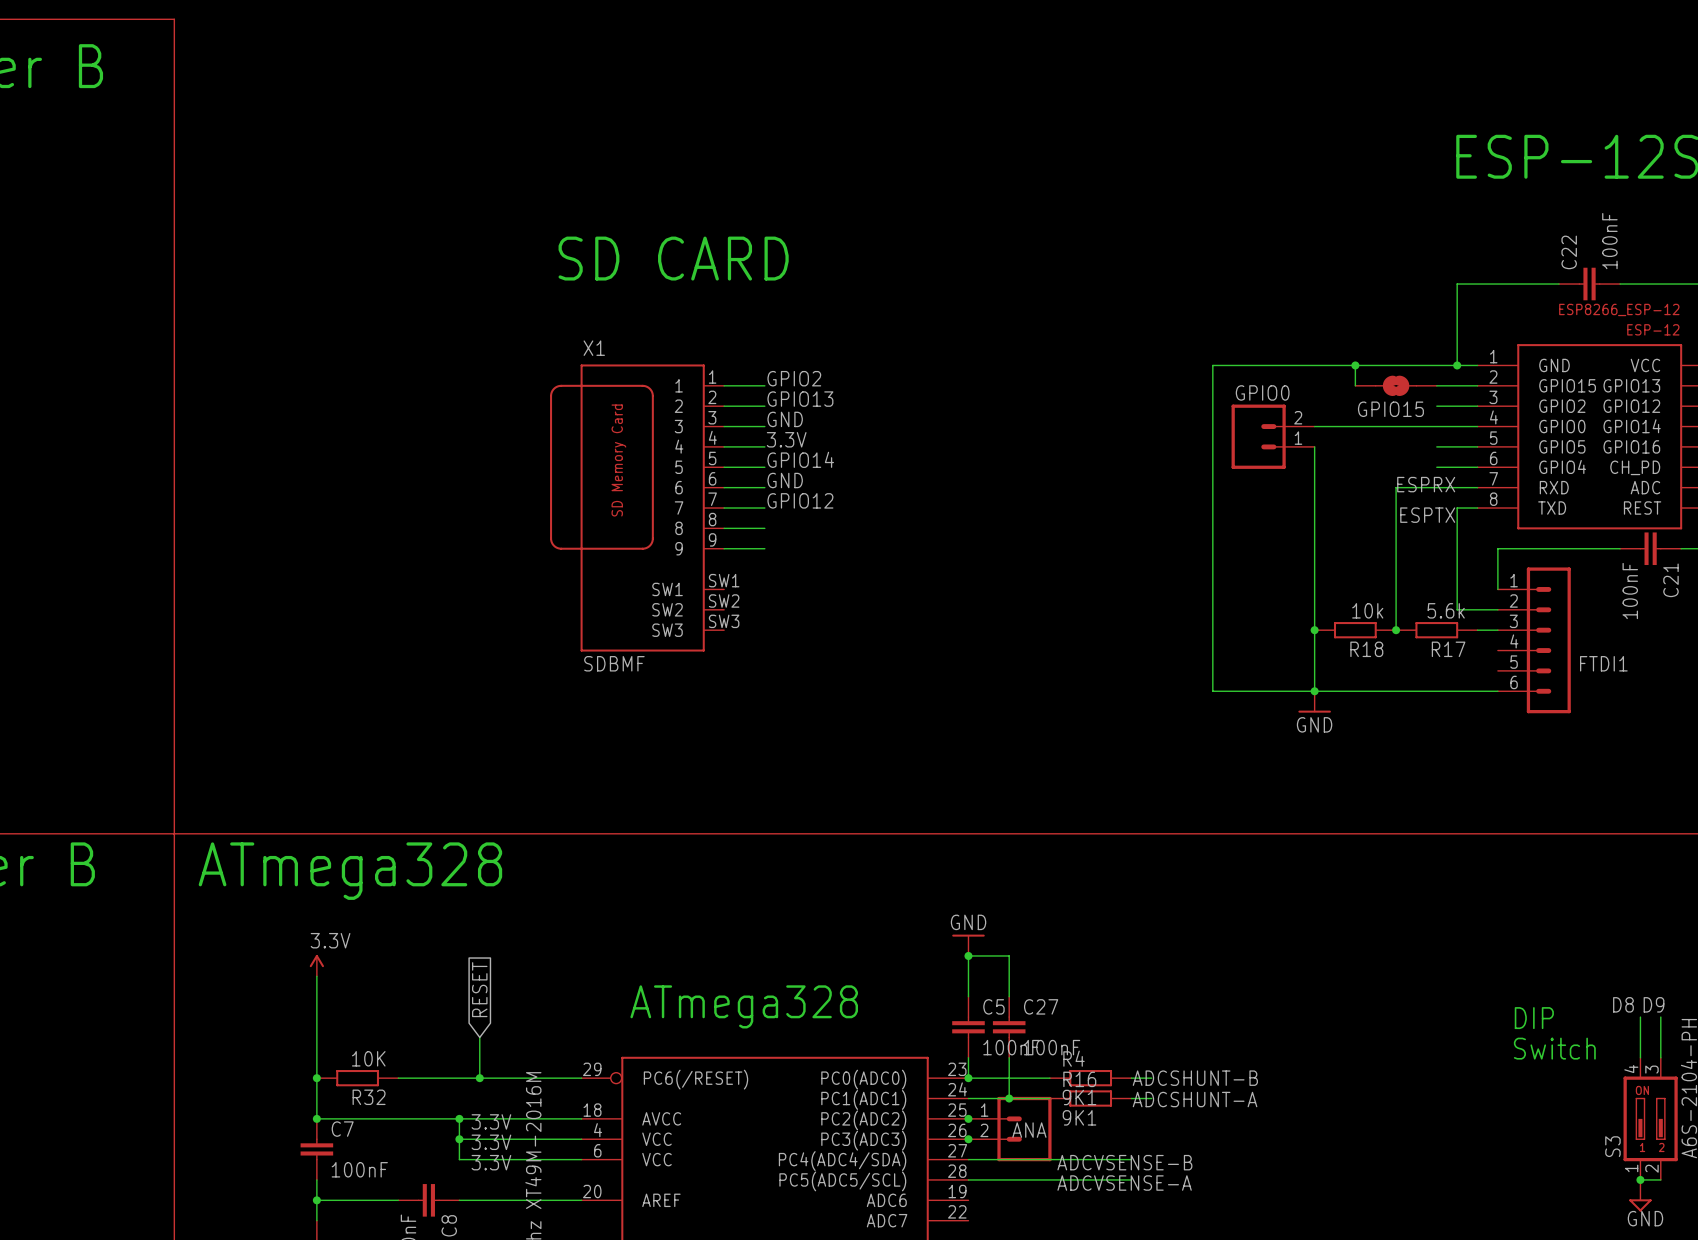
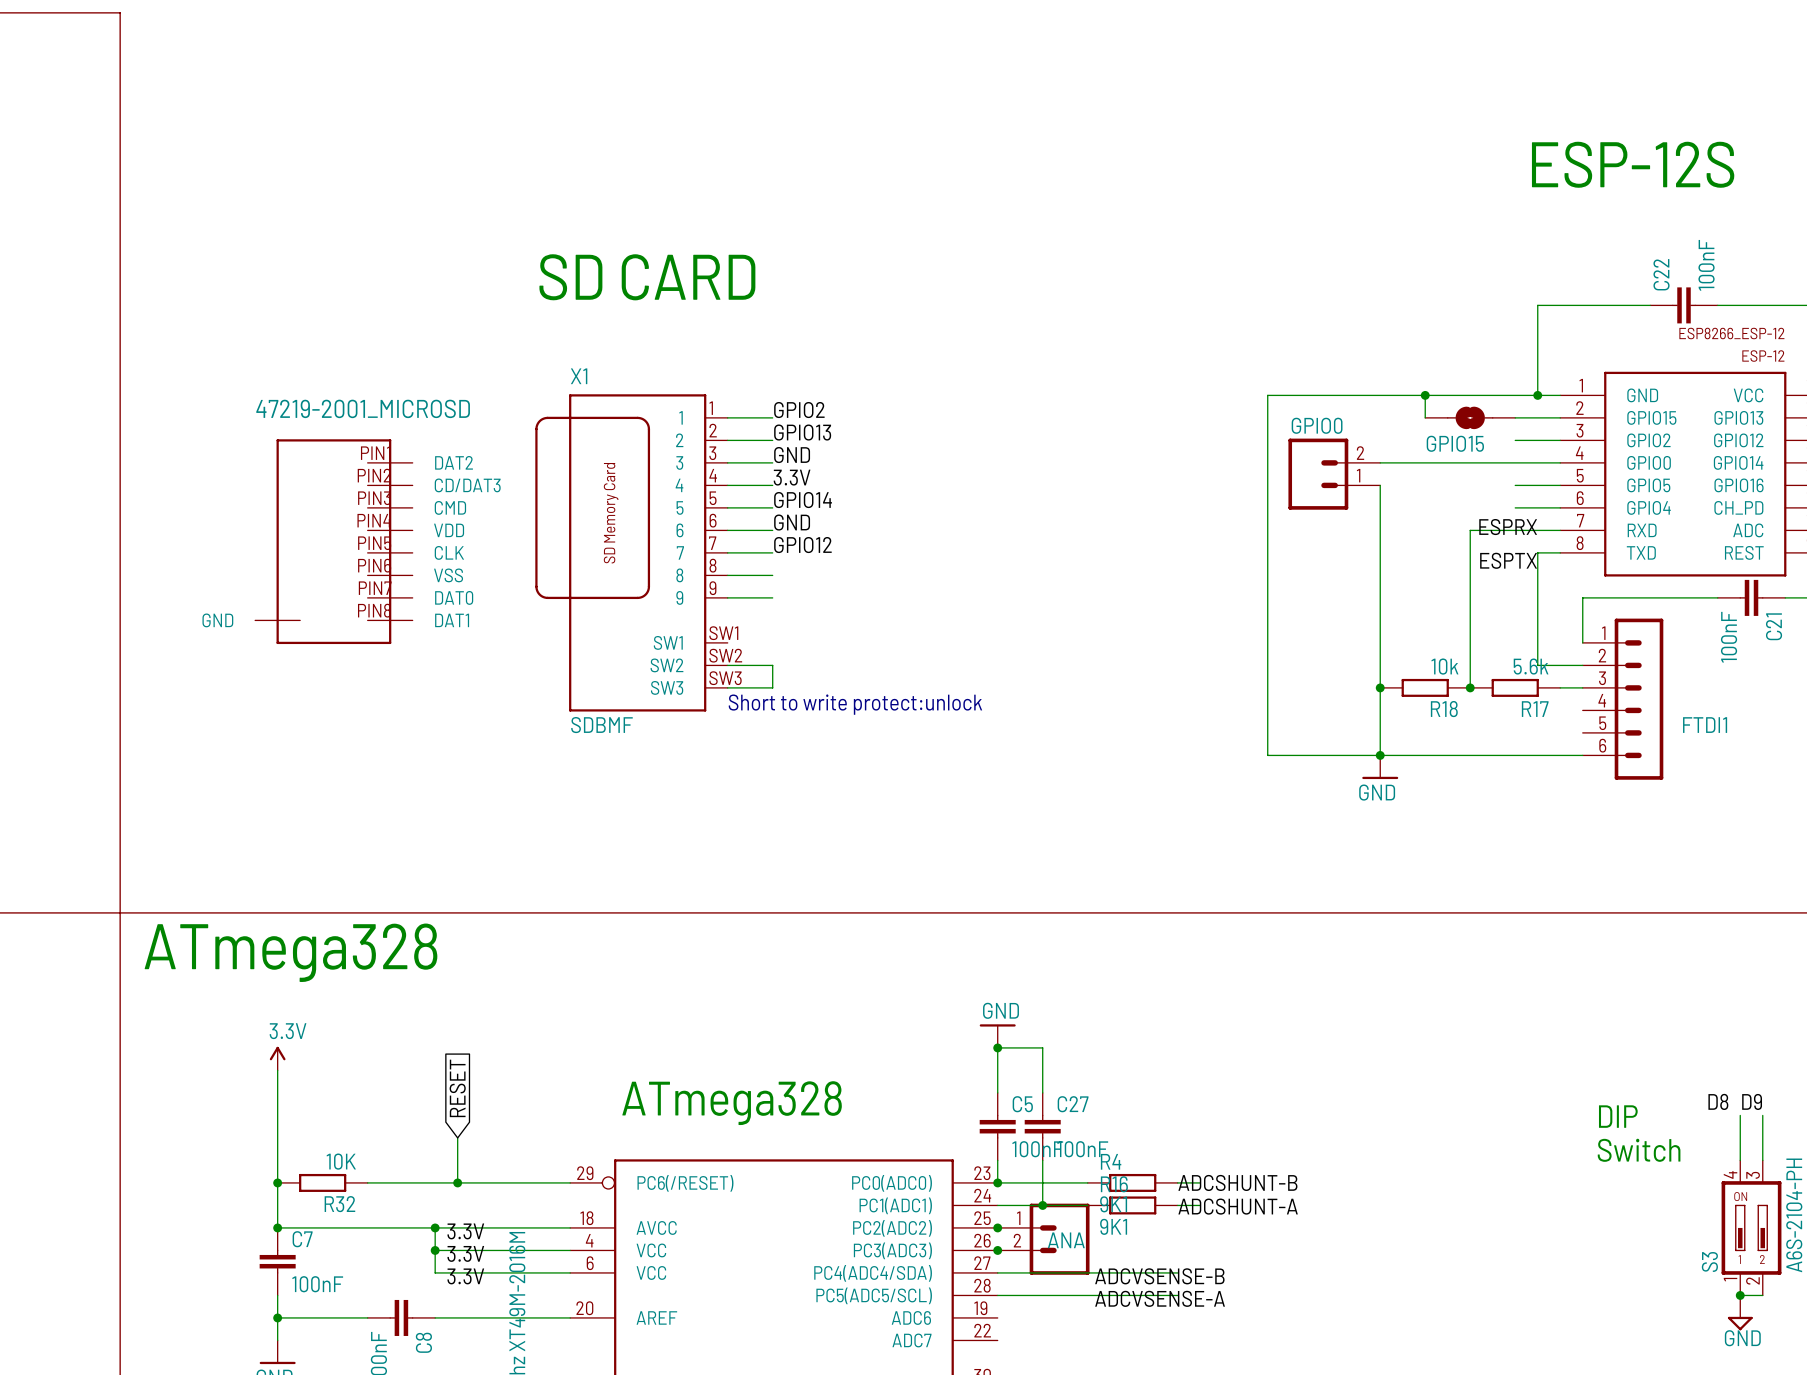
part: none -> (333, 541)
wire: none -> (727, 665) (772, 665) (772, 687) (727, 687)
text: none -> Short to write protect:unlock (855, 704)

